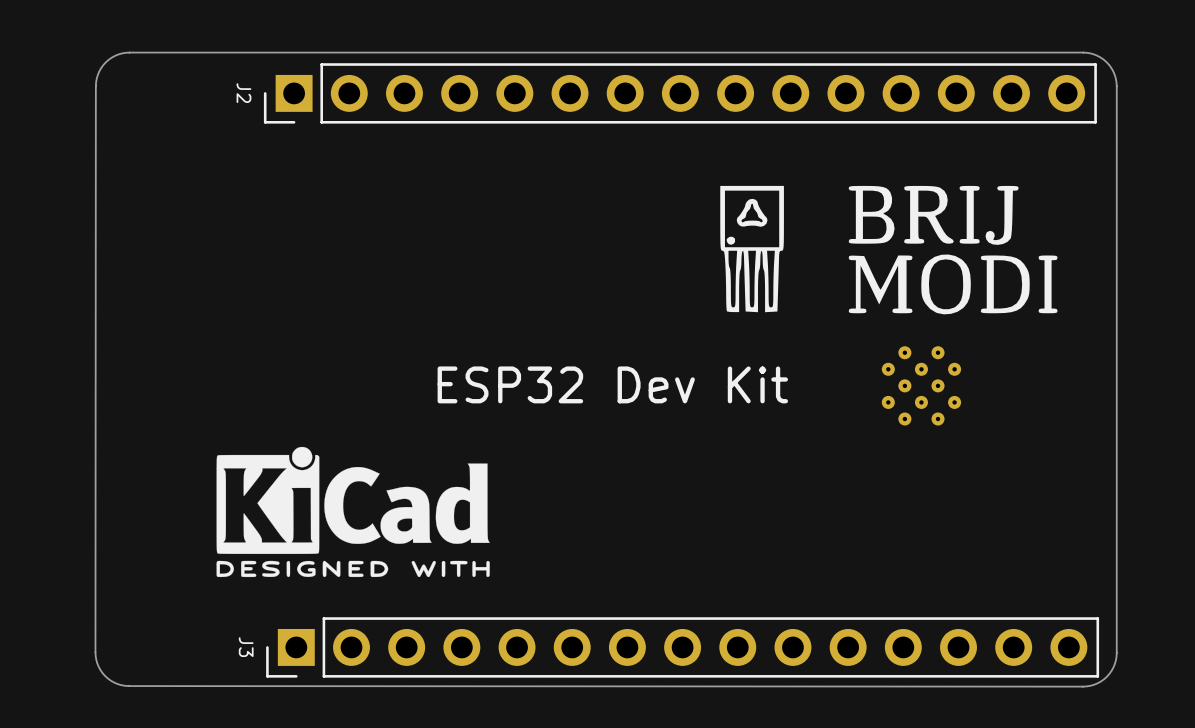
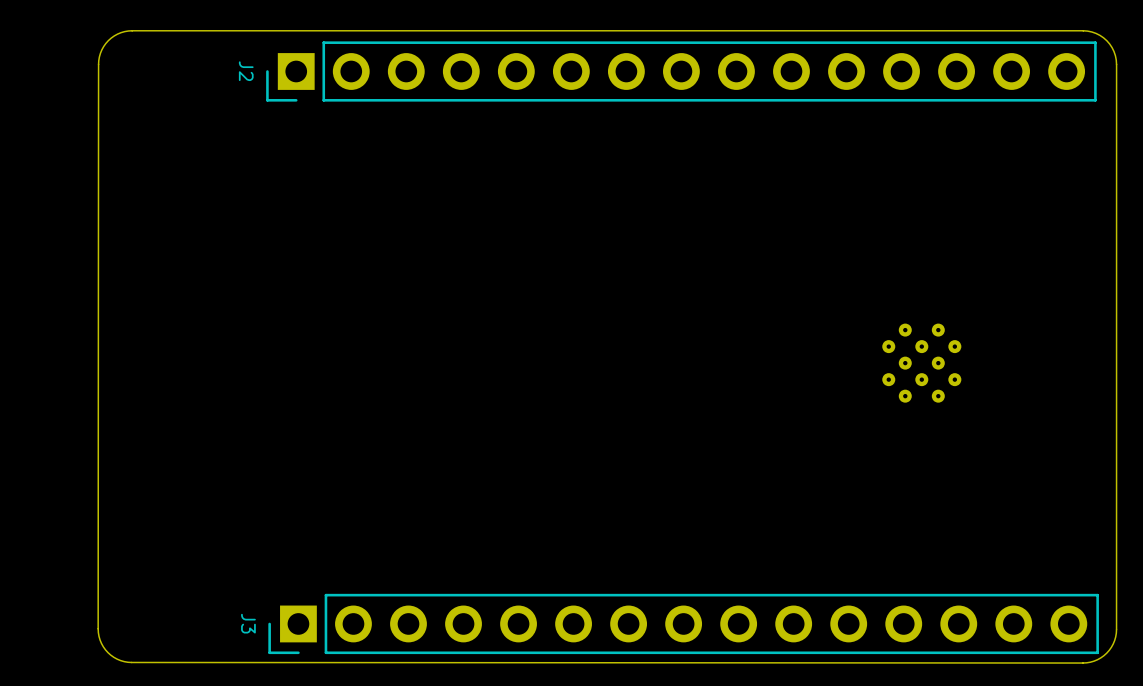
drawing: [720, 185, 1058, 315] -> none
text: ESP32 Dev Kit (612, 384) -> none
drawing: [216, 446, 490, 578] -> none

